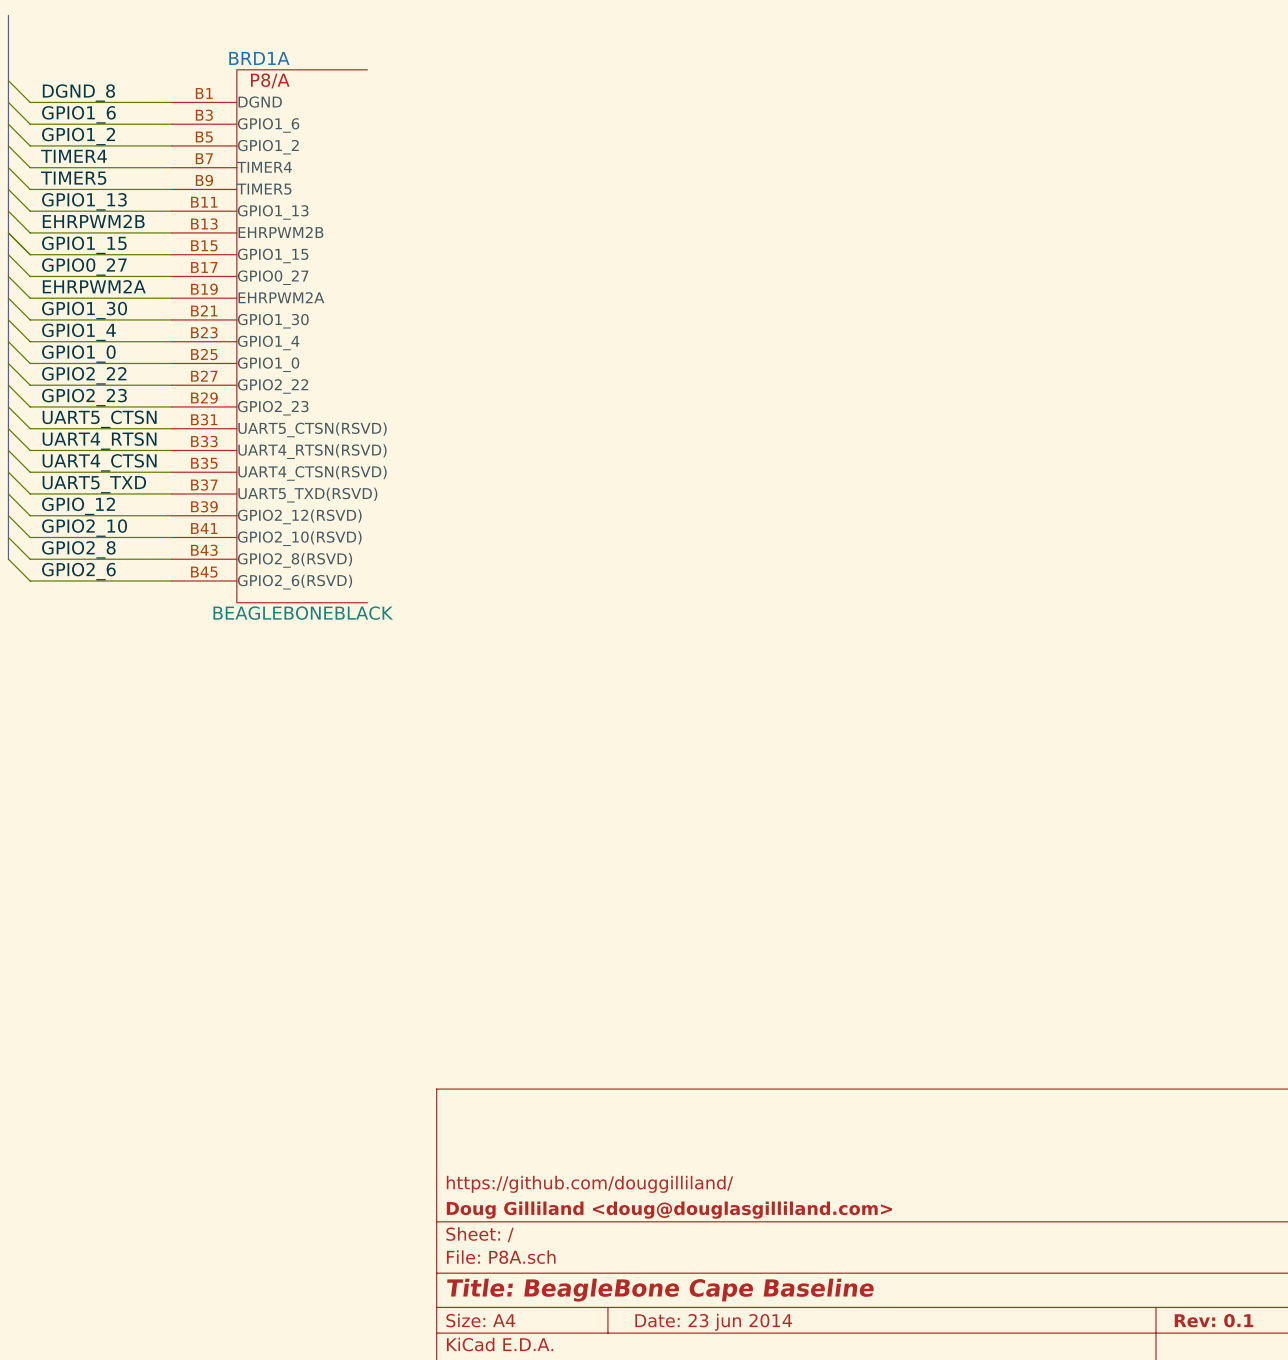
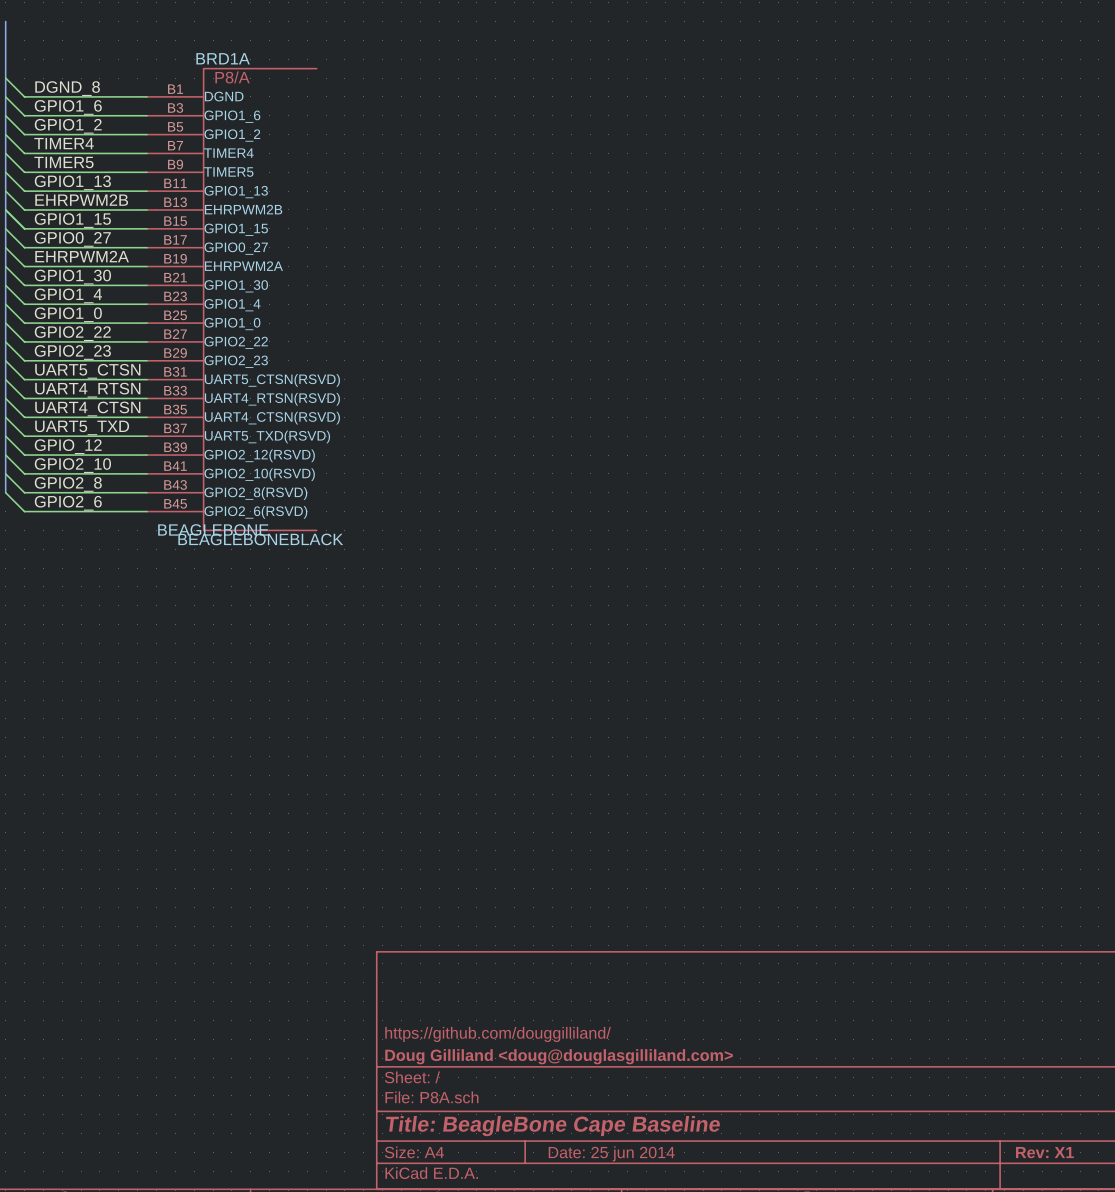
BRD1A text: none -> BEAGLEBONE (213, 530)
title block: Rev: 0.1 (1214, 1320) -> Rev: X1 (1044, 1152)
title block: Date: 23 jun 2014 (713, 1322) -> Date: 25 jun 2014 (611, 1153)

